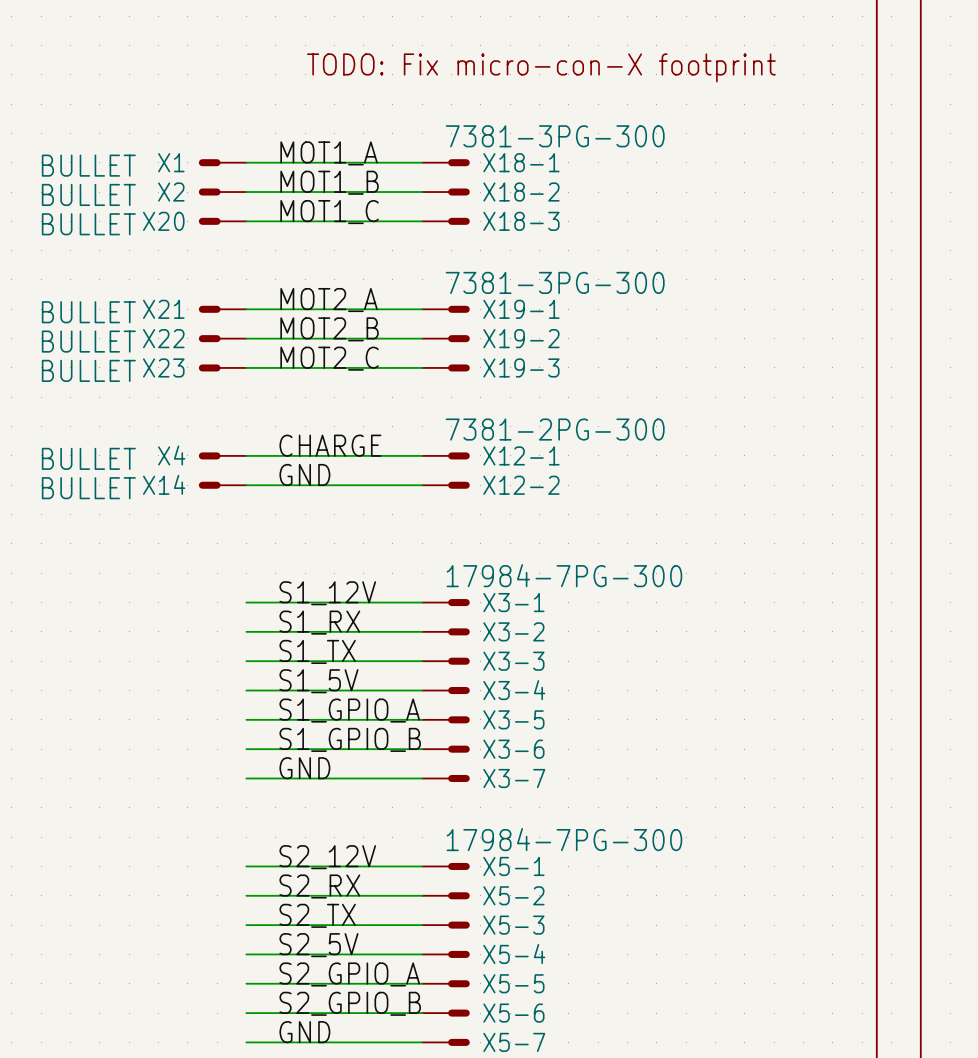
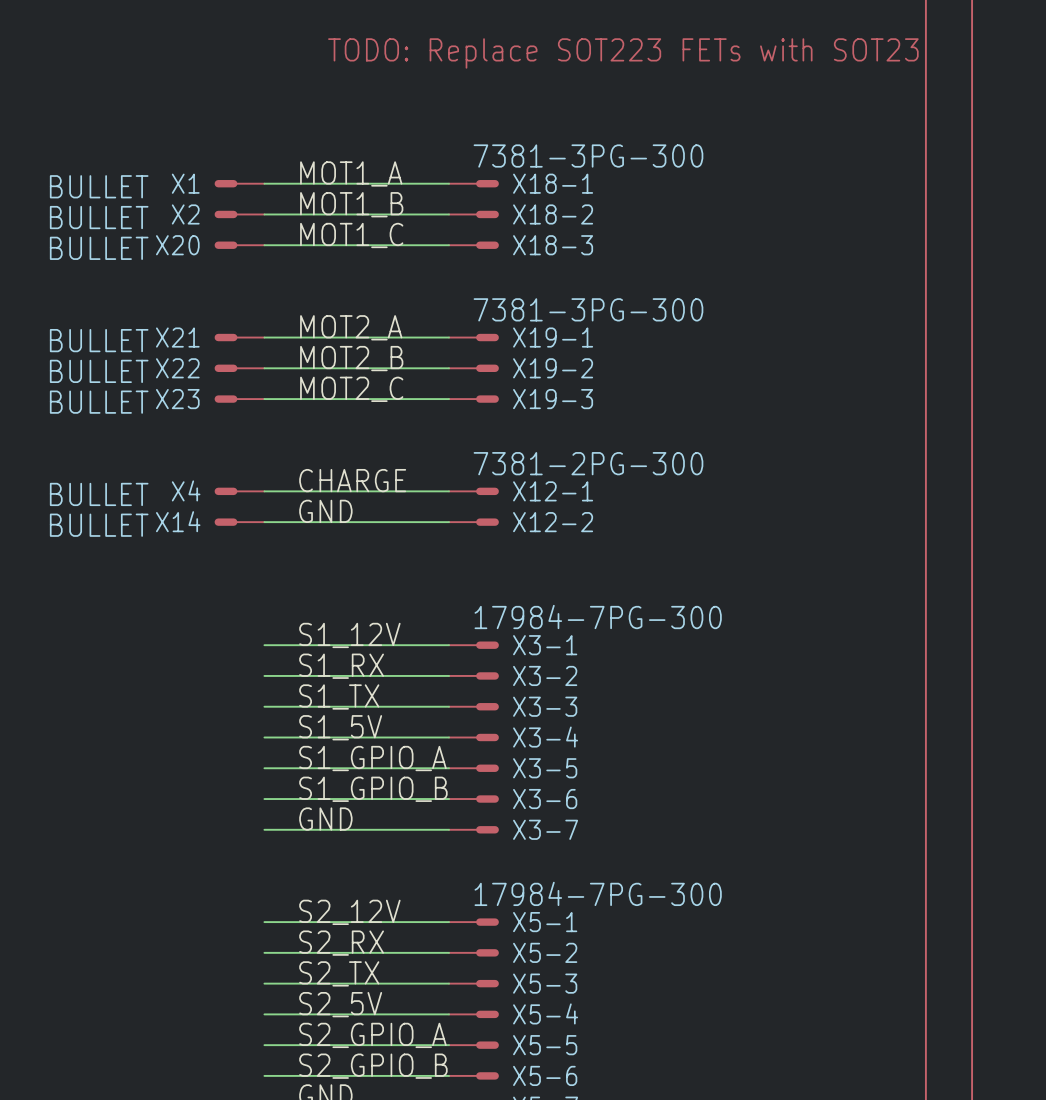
text: none -> TODO: Replace SOT223 FETs with SOT23 (623, 53)
text: TODO: Fix micro-con-X footprint (541, 67) -> none

